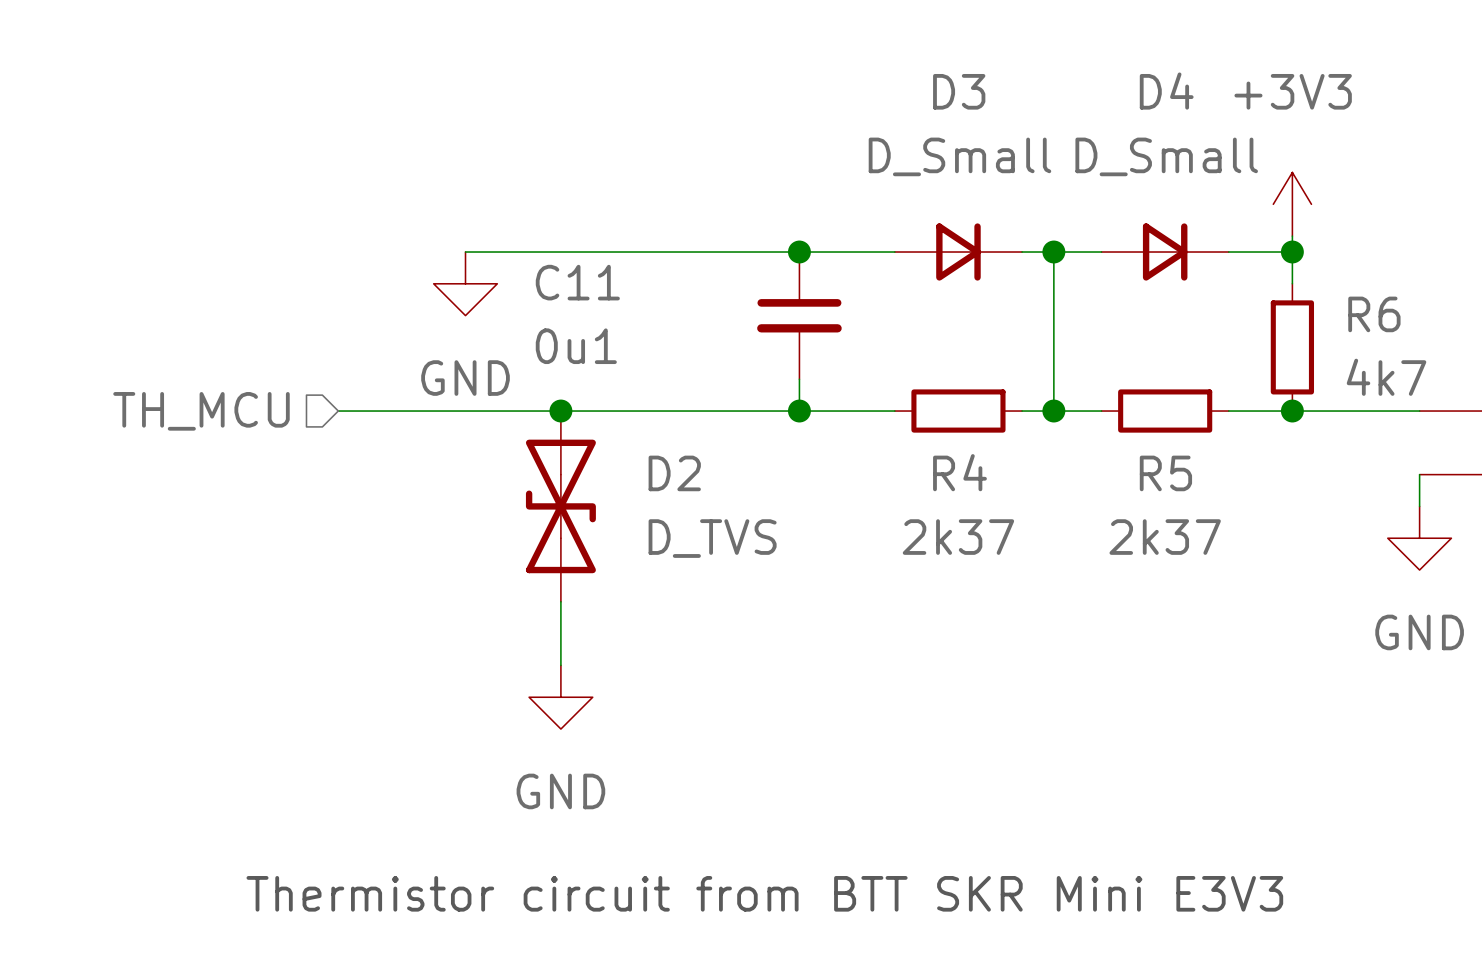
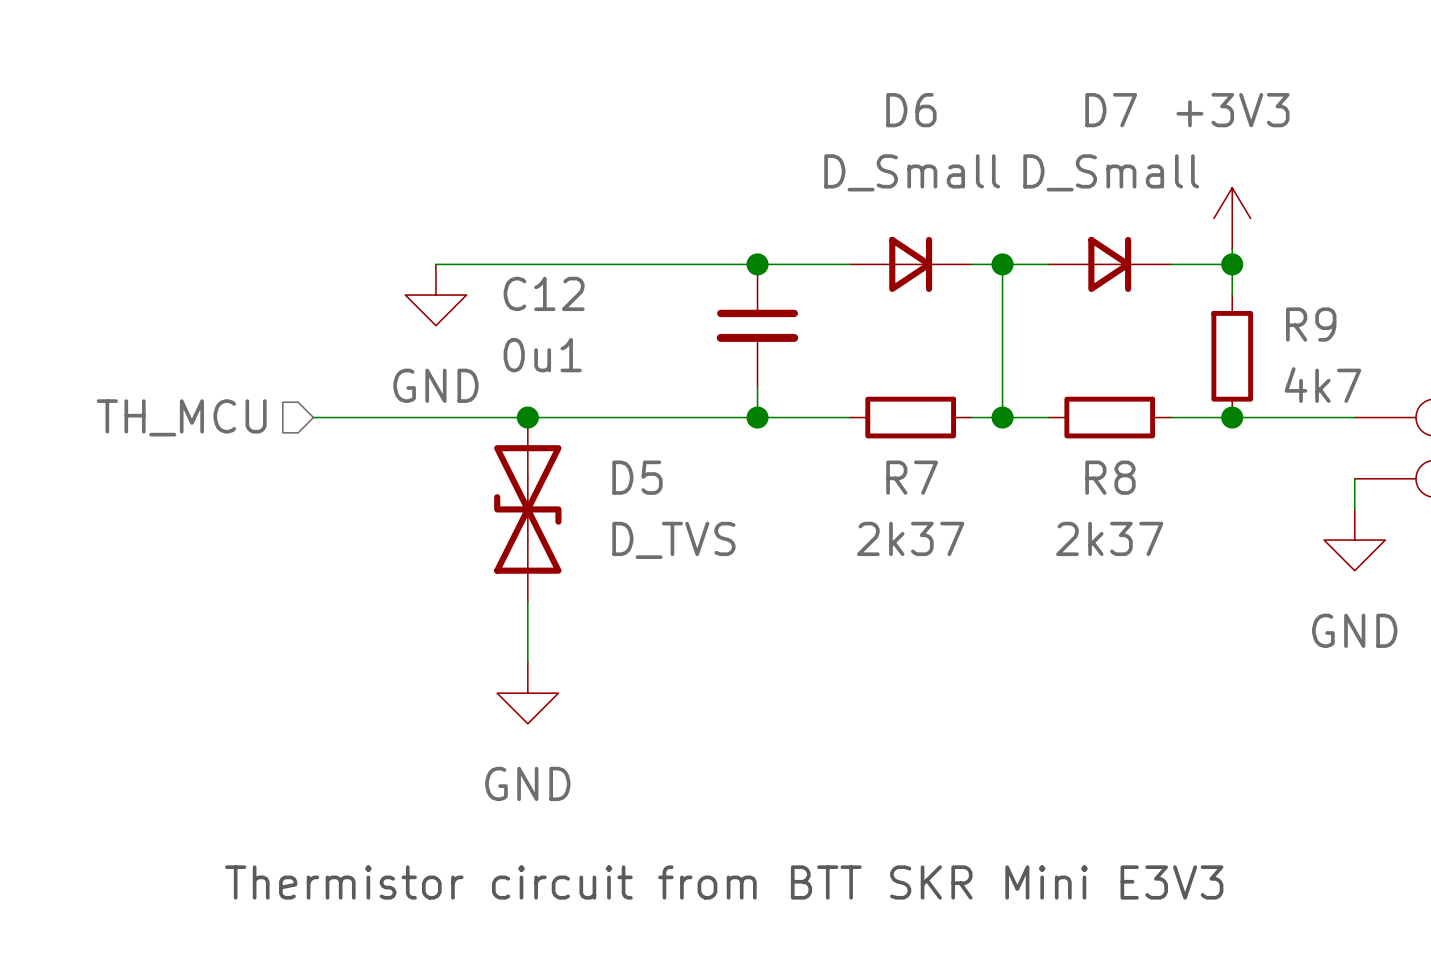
D3 name: D3 (959, 91) -> D6 (911, 110)
D4 name: D4 (1166, 91) -> D7 (1111, 110)
C11 name: C11 (577, 282) -> C12 (544, 293)
R6 name: R6 (1374, 314) -> R9 (1311, 324)
R4 name: R4 (959, 472) -> R7 (912, 477)
D2 name: D2 (674, 473) -> D5 (637, 477)
R5 name: R5 (1165, 473) -> R8 (1110, 477)

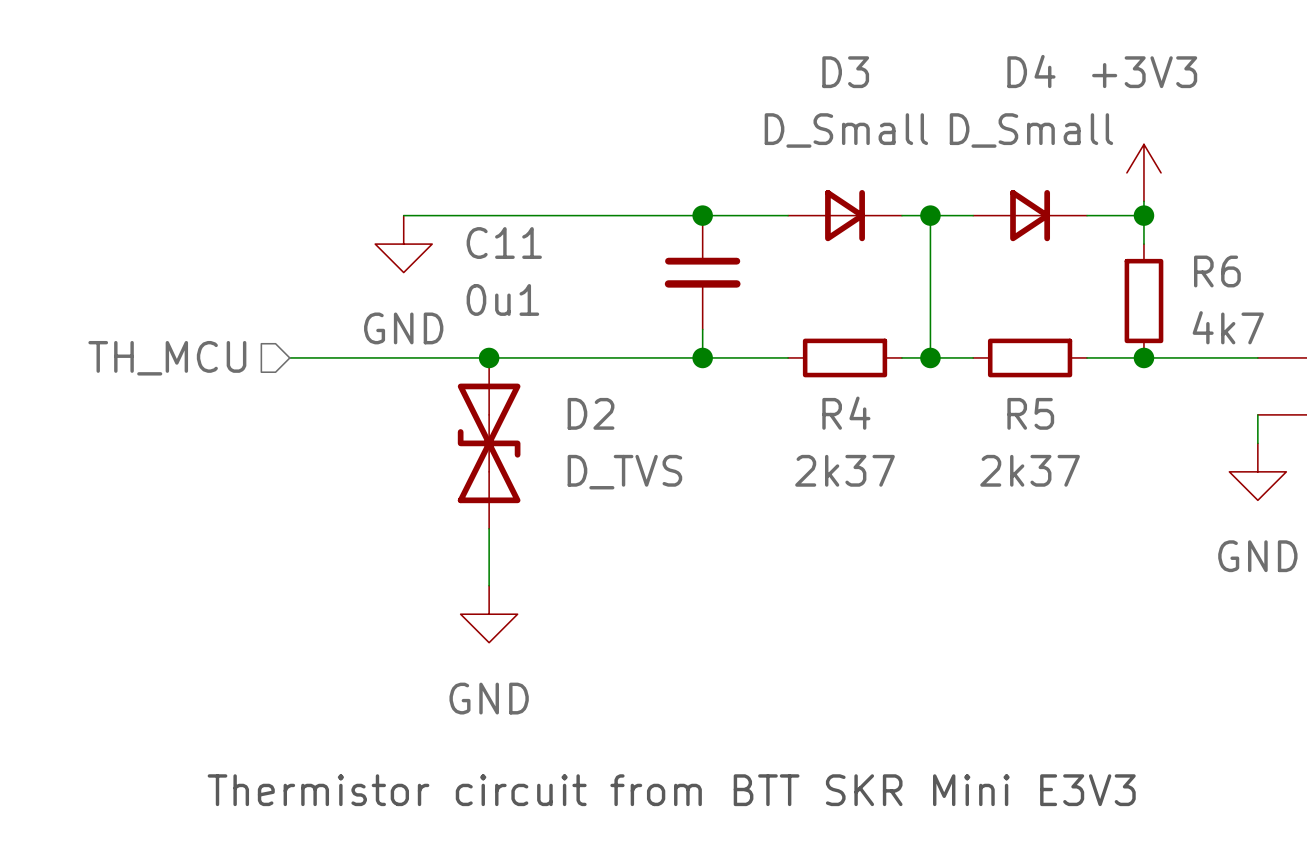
D6 name: D6 (911, 110) -> D3 (845, 72)
D7 name: D7 (1111, 110) -> D4 (1031, 71)
C12 name: C12 (544, 293) -> C11 (504, 243)
R9 name: R9 (1311, 324) -> R6 (1217, 271)
D5 name: D5 (637, 477) -> D2 (591, 413)
R7 name: R7 (912, 477) -> R4 (846, 413)
R8 name: R8 (1110, 477) -> R5 (1030, 413)

